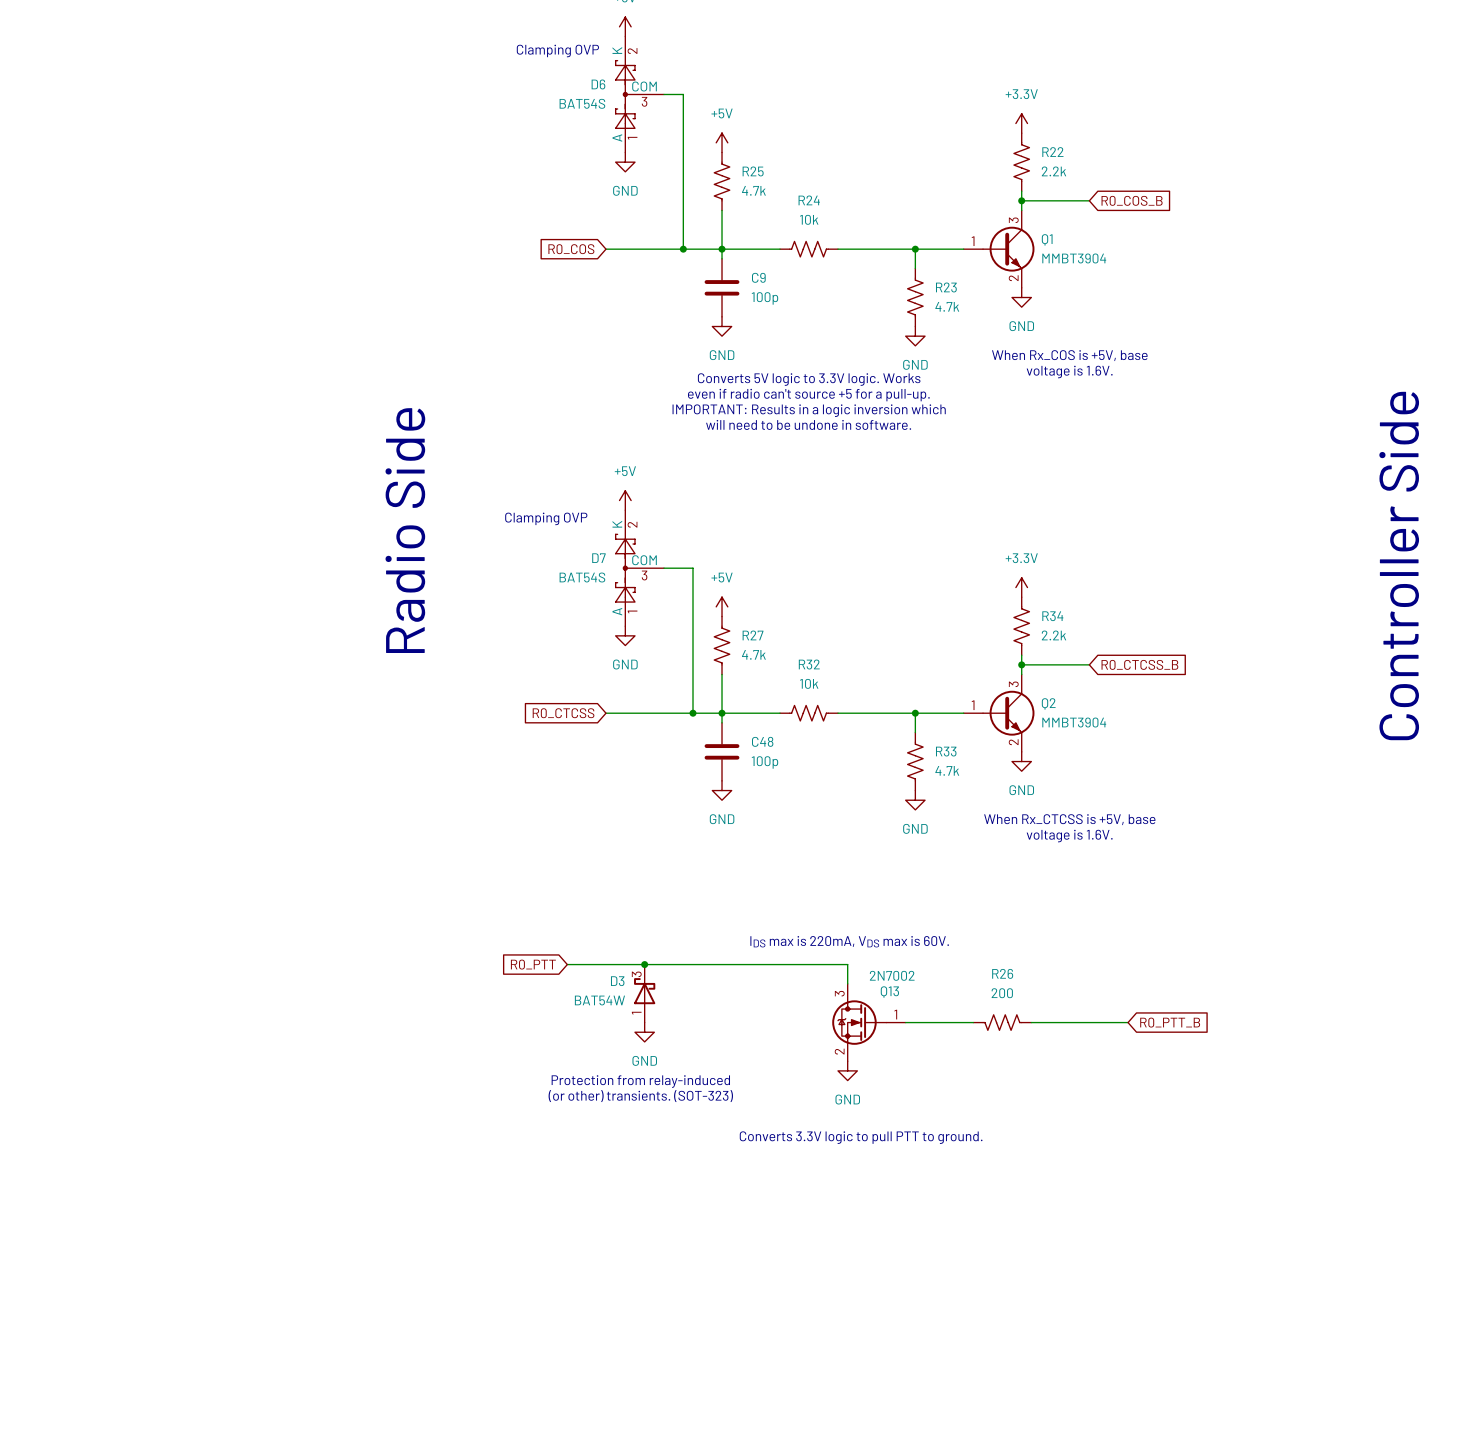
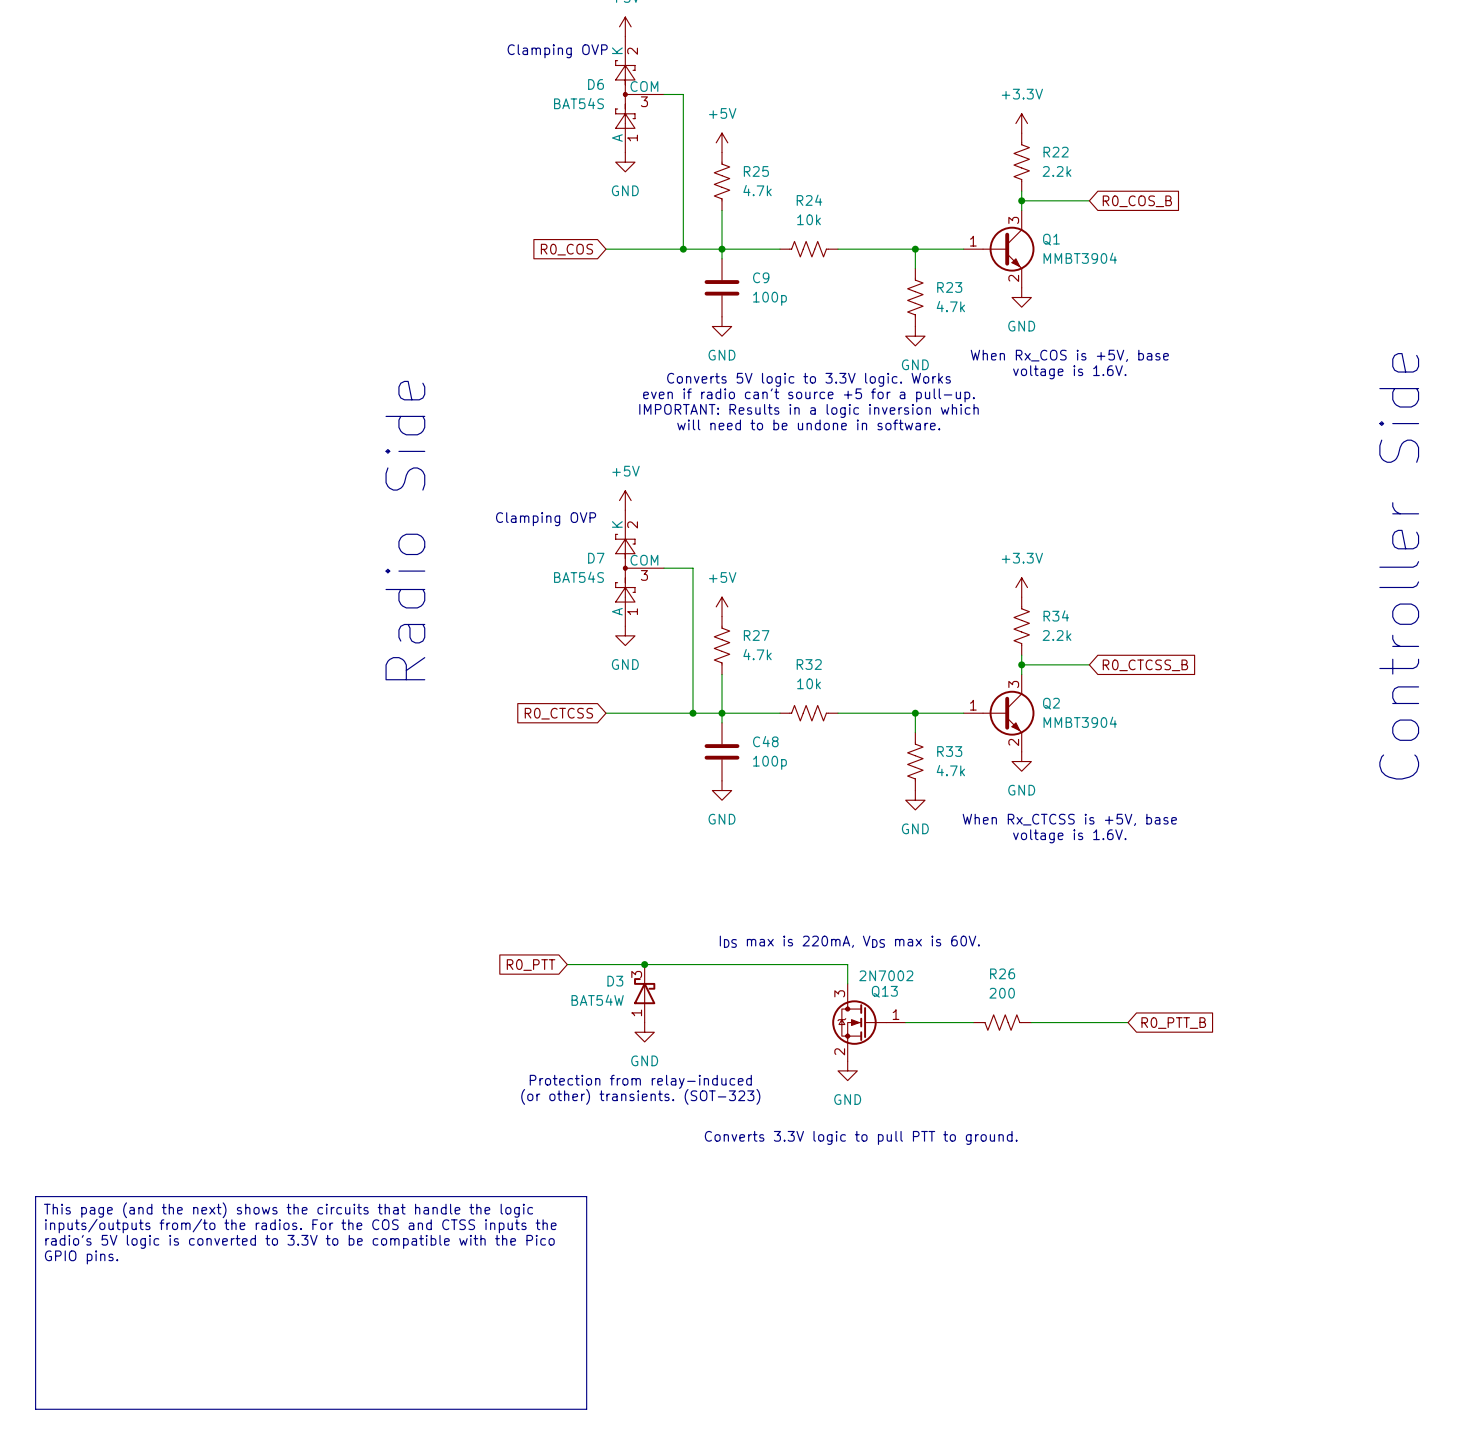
line: none -> (35, 1196) (586, 1196) (586, 1409) (35, 1409) (35, 1196)
text: none -> This page (and the next) shows the circuits that handle the logic (288, 1210)
text: none -> inputs/outputs from/to the radios. For the COS and CTSS inputs the (300, 1226)
text: none -> radio's 5V logic is converted to 3.3V to be compatible with the Pico (300, 1241)
text: none -> GPIO pins. (81, 1257)

